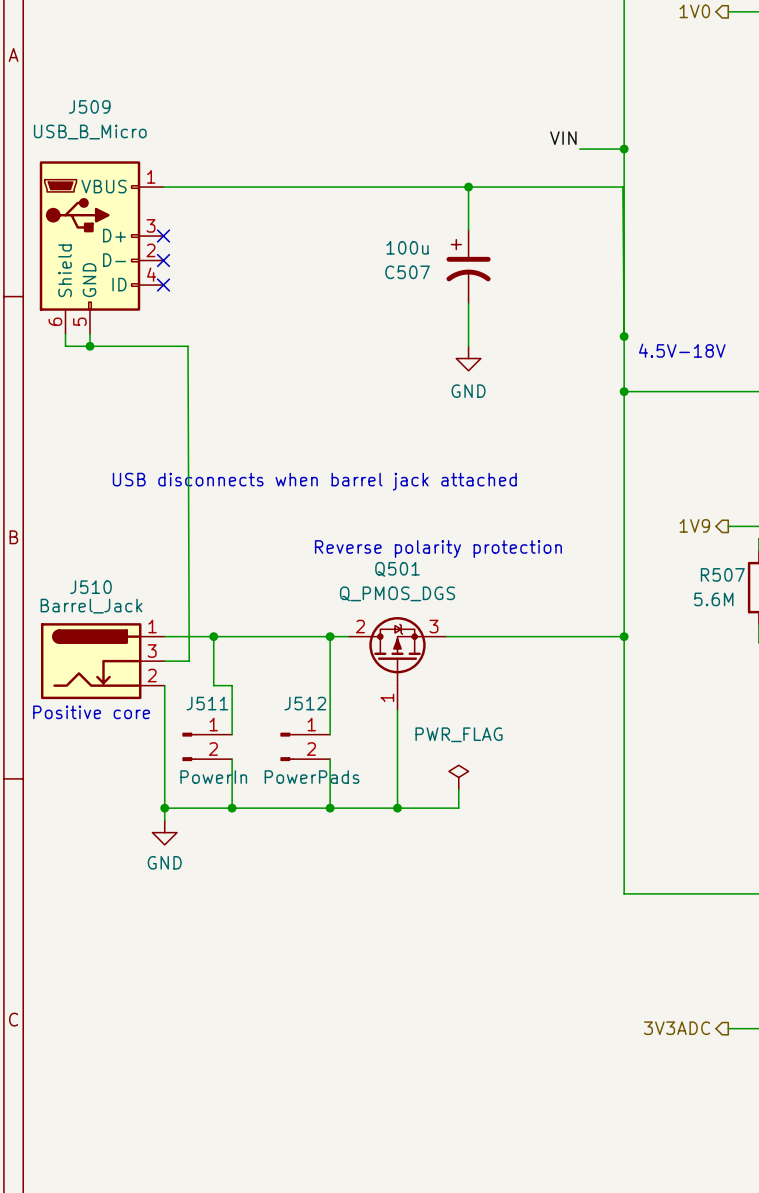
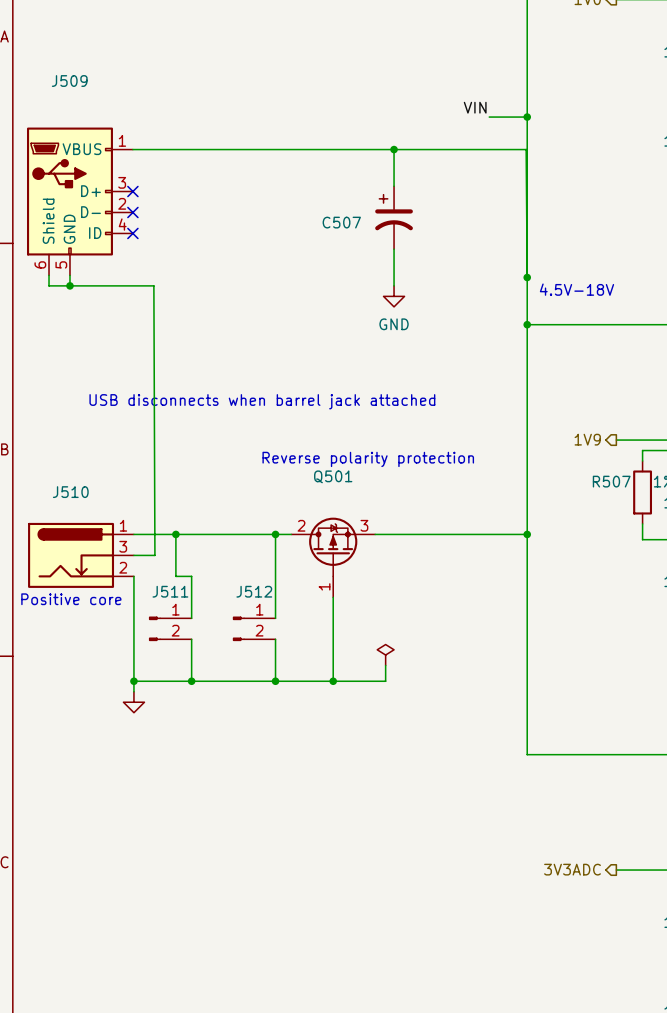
J509 value: USB_B_Micro (90, 132) -> none
C507 value: 100u (407, 247) -> none
Q501 value: Q_PMOS_DGS (397, 593) -> none
R507 value: 5.6M (713, 599) -> none
J510 value: Barrel_Jack (91, 606) -> none
power symbol text: PWR_FLAG (459, 734) -> none
J511 value: PowerIn (213, 777) -> none
J512 value: PowerPads (312, 777) -> none
power symbol text: GND (164, 862) -> none

